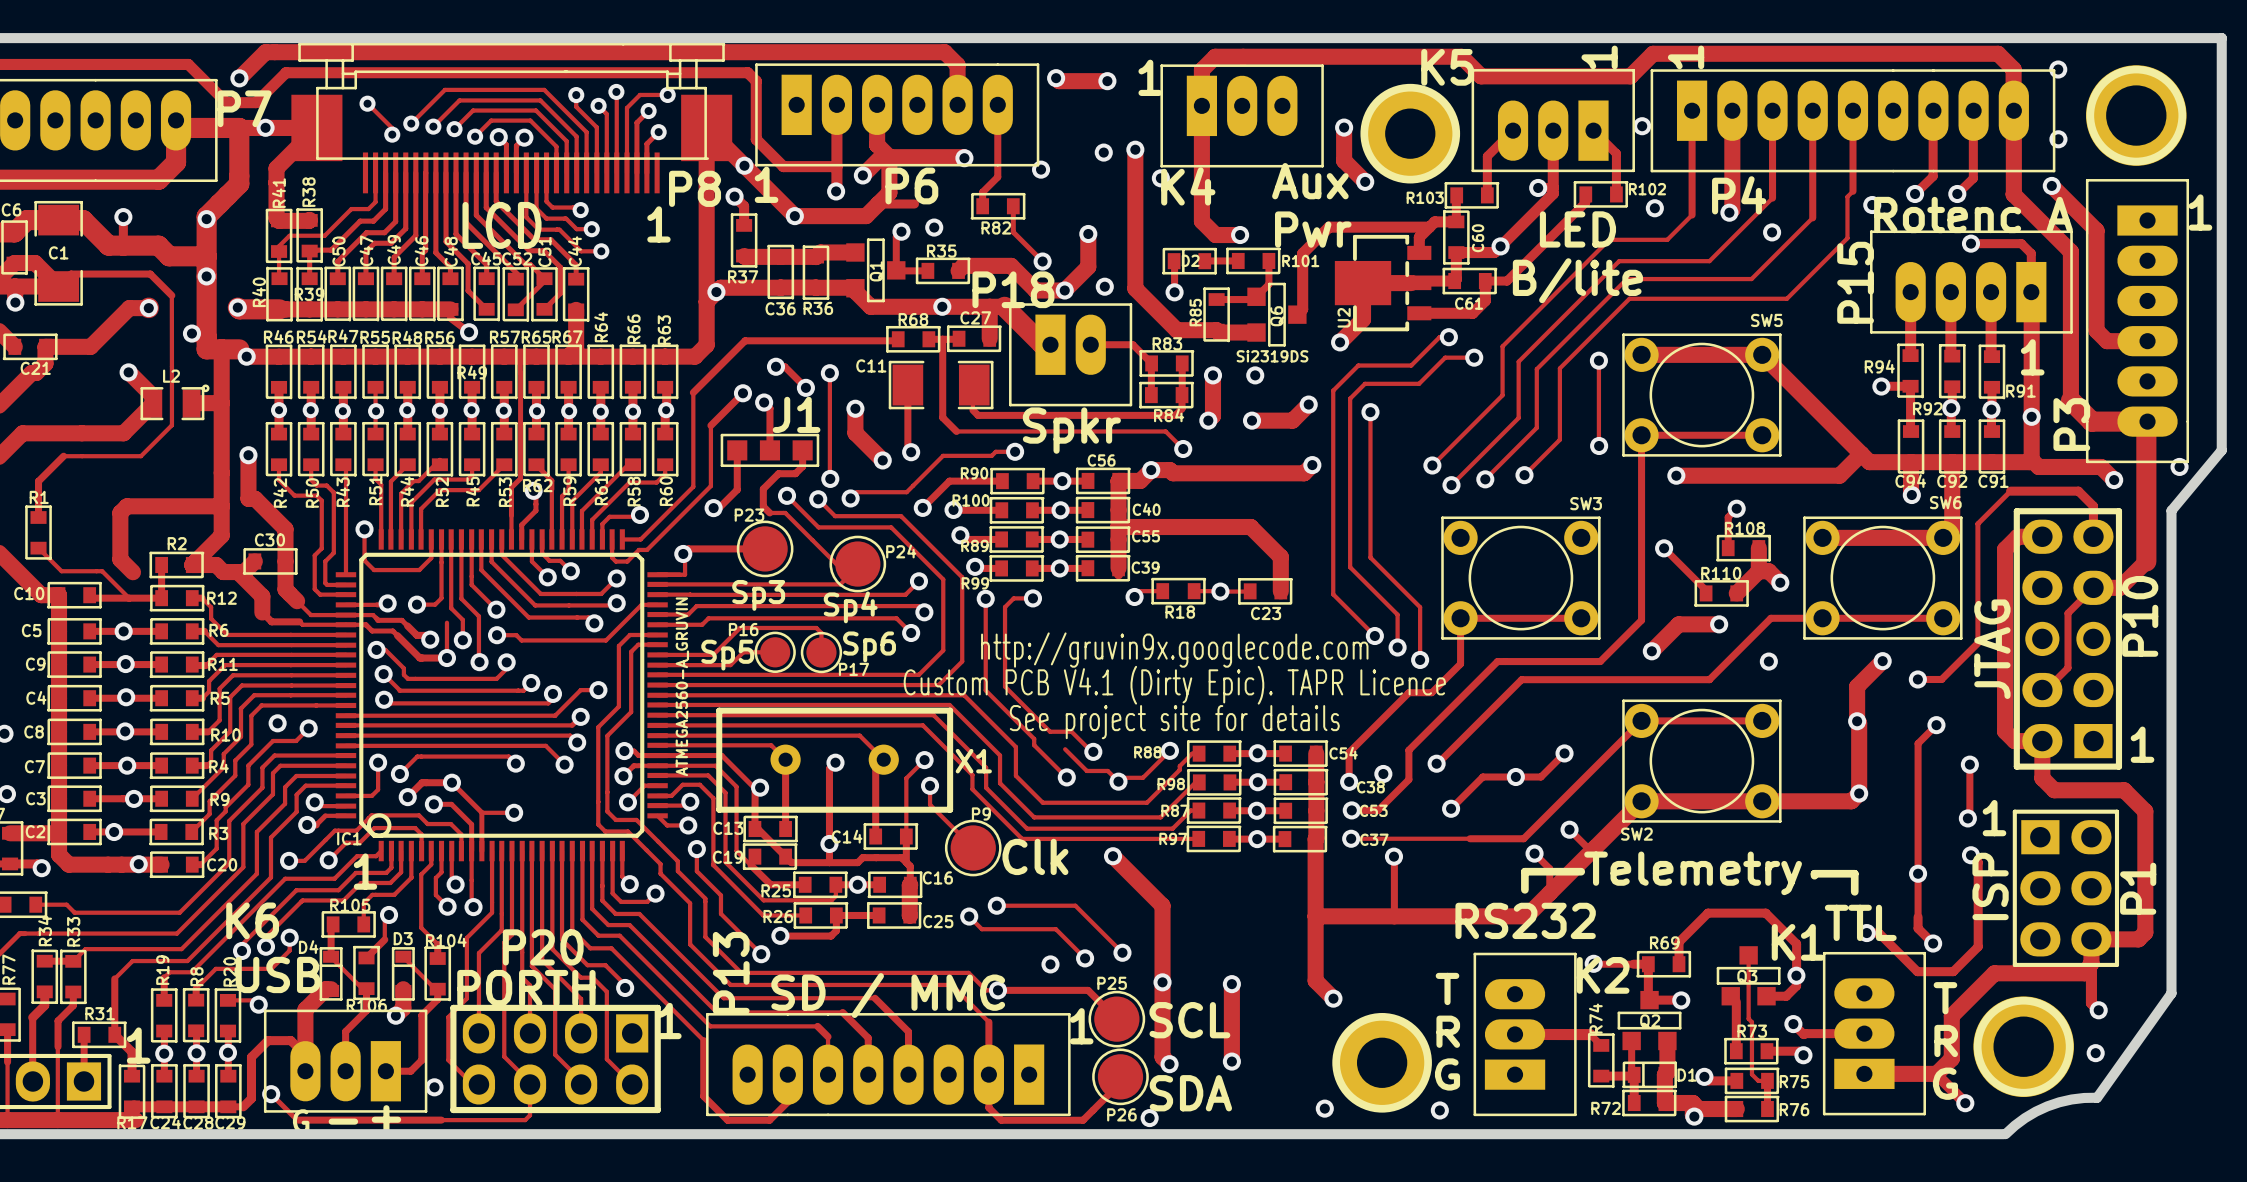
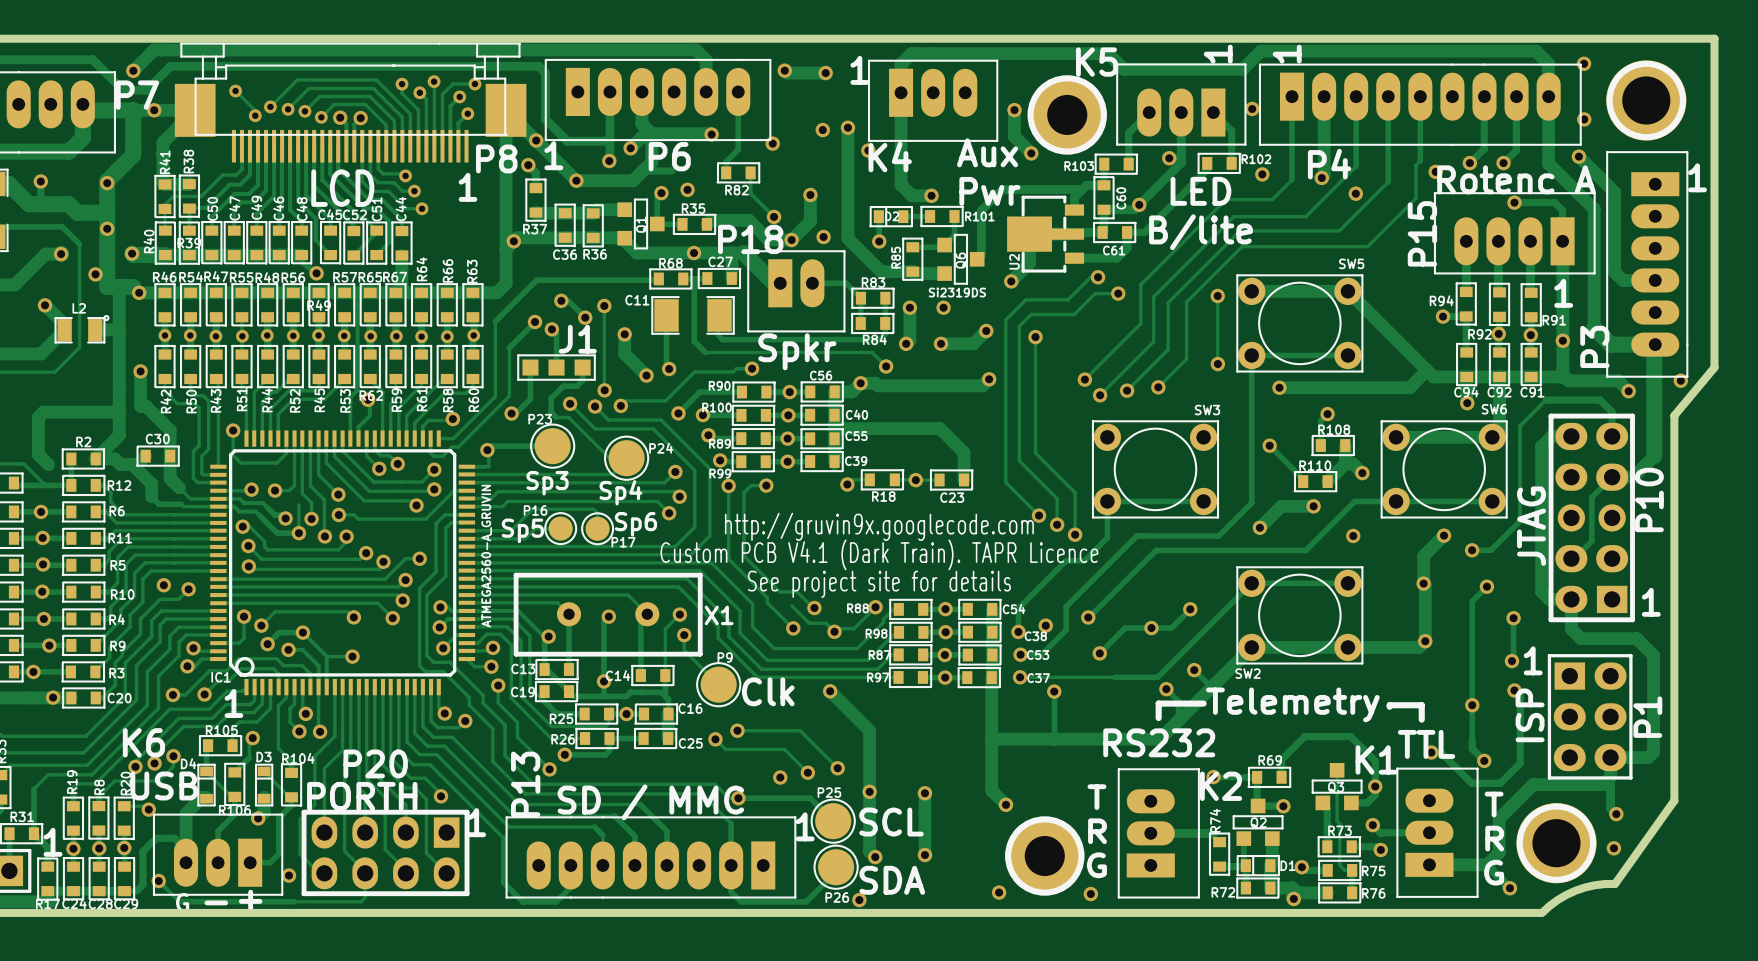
text: Custom PCB V4.1 (Dirty Epic). TAPR Licence (1174, 685) -> Custom PCB V4.1 (Dark Train). TAPR Licence (879, 554)

